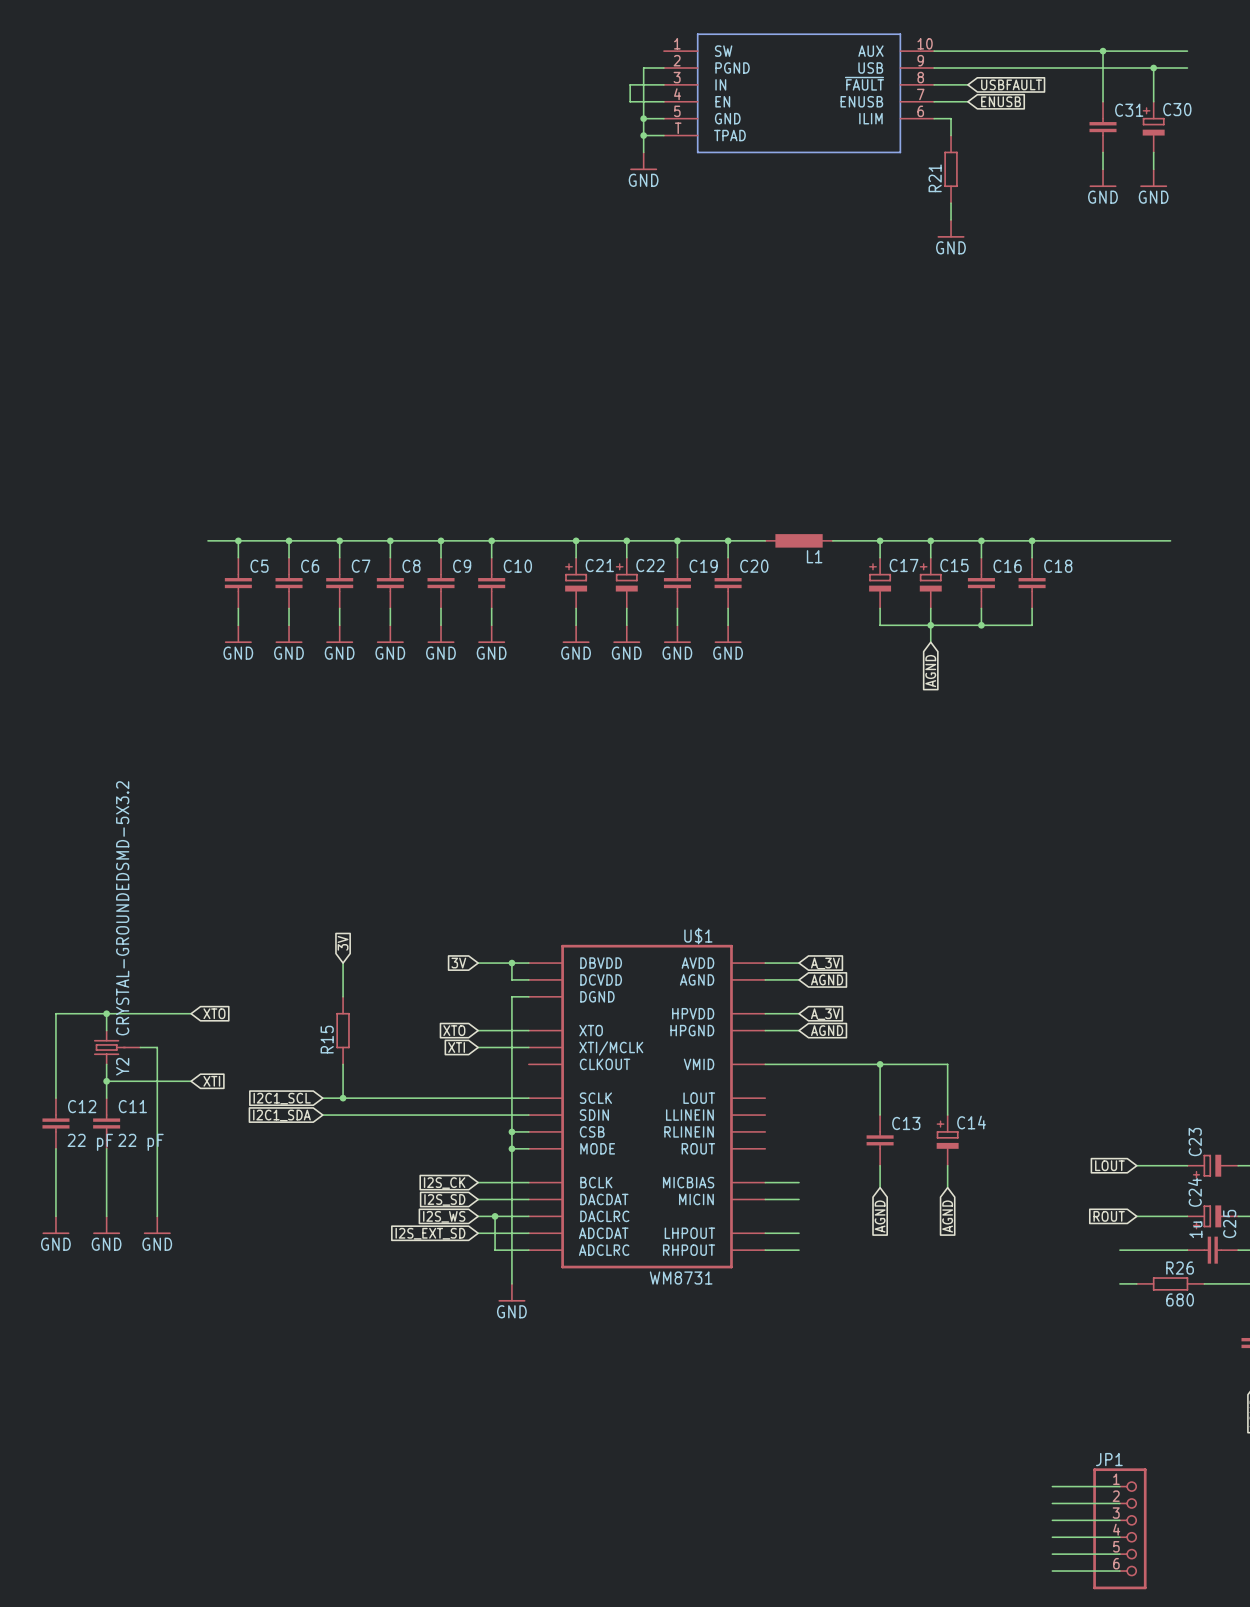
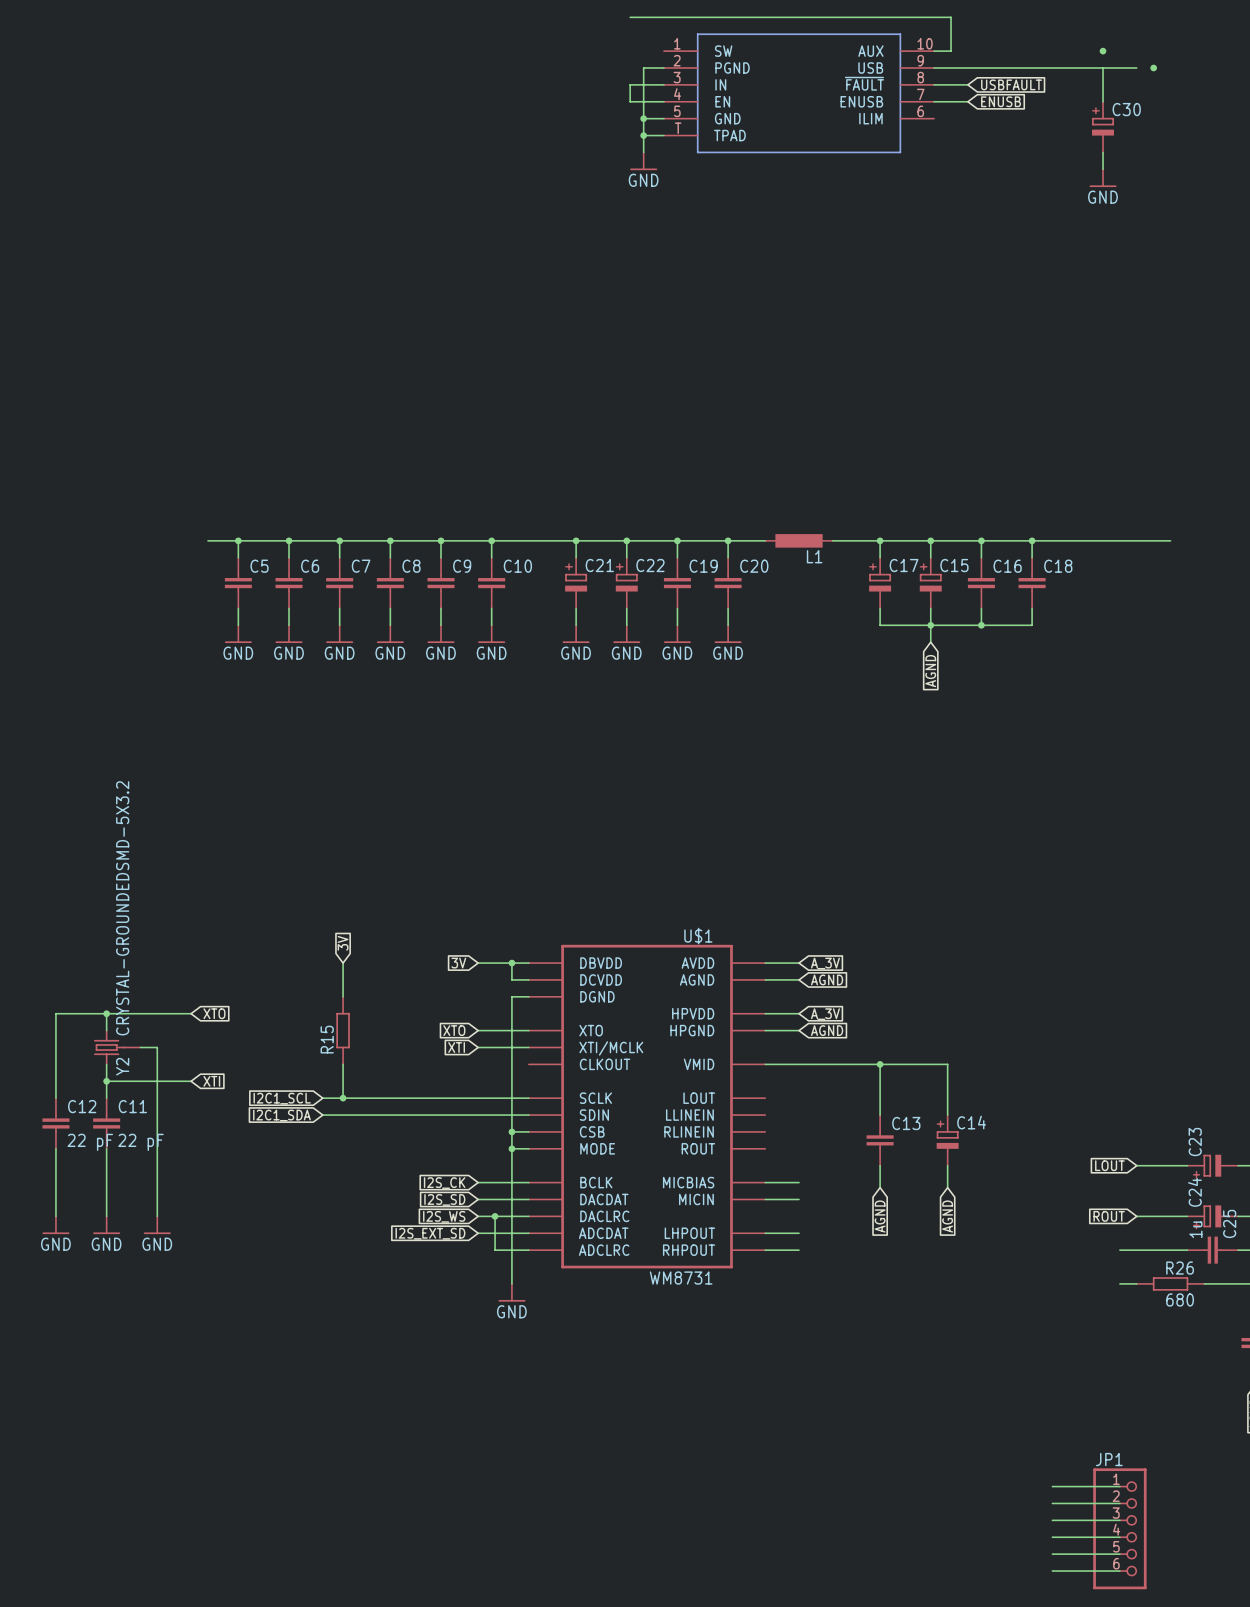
wire: (951, 51) (1187, 51) -> (951, 51) (951, 17) (630, 17)
wire: (1103, 51) (1103, 68) -> none
wire: (1136, 68) (1187, 68) -> none
wire: (1153, 68) (1153, 101) -> none
wire: (934, 118) (951, 118) (951, 135) -> none
C31: (1103, 127) -> none
C30 position: (1153, 127) -> (1103, 127)
wire: (1153, 152) (1153, 169) -> none
R21: (951, 169) -> none
power symbol: GND (1153, 178) -> none
wire: (951, 203) (951, 219) -> none
power symbol: GND (951, 228) -> none

